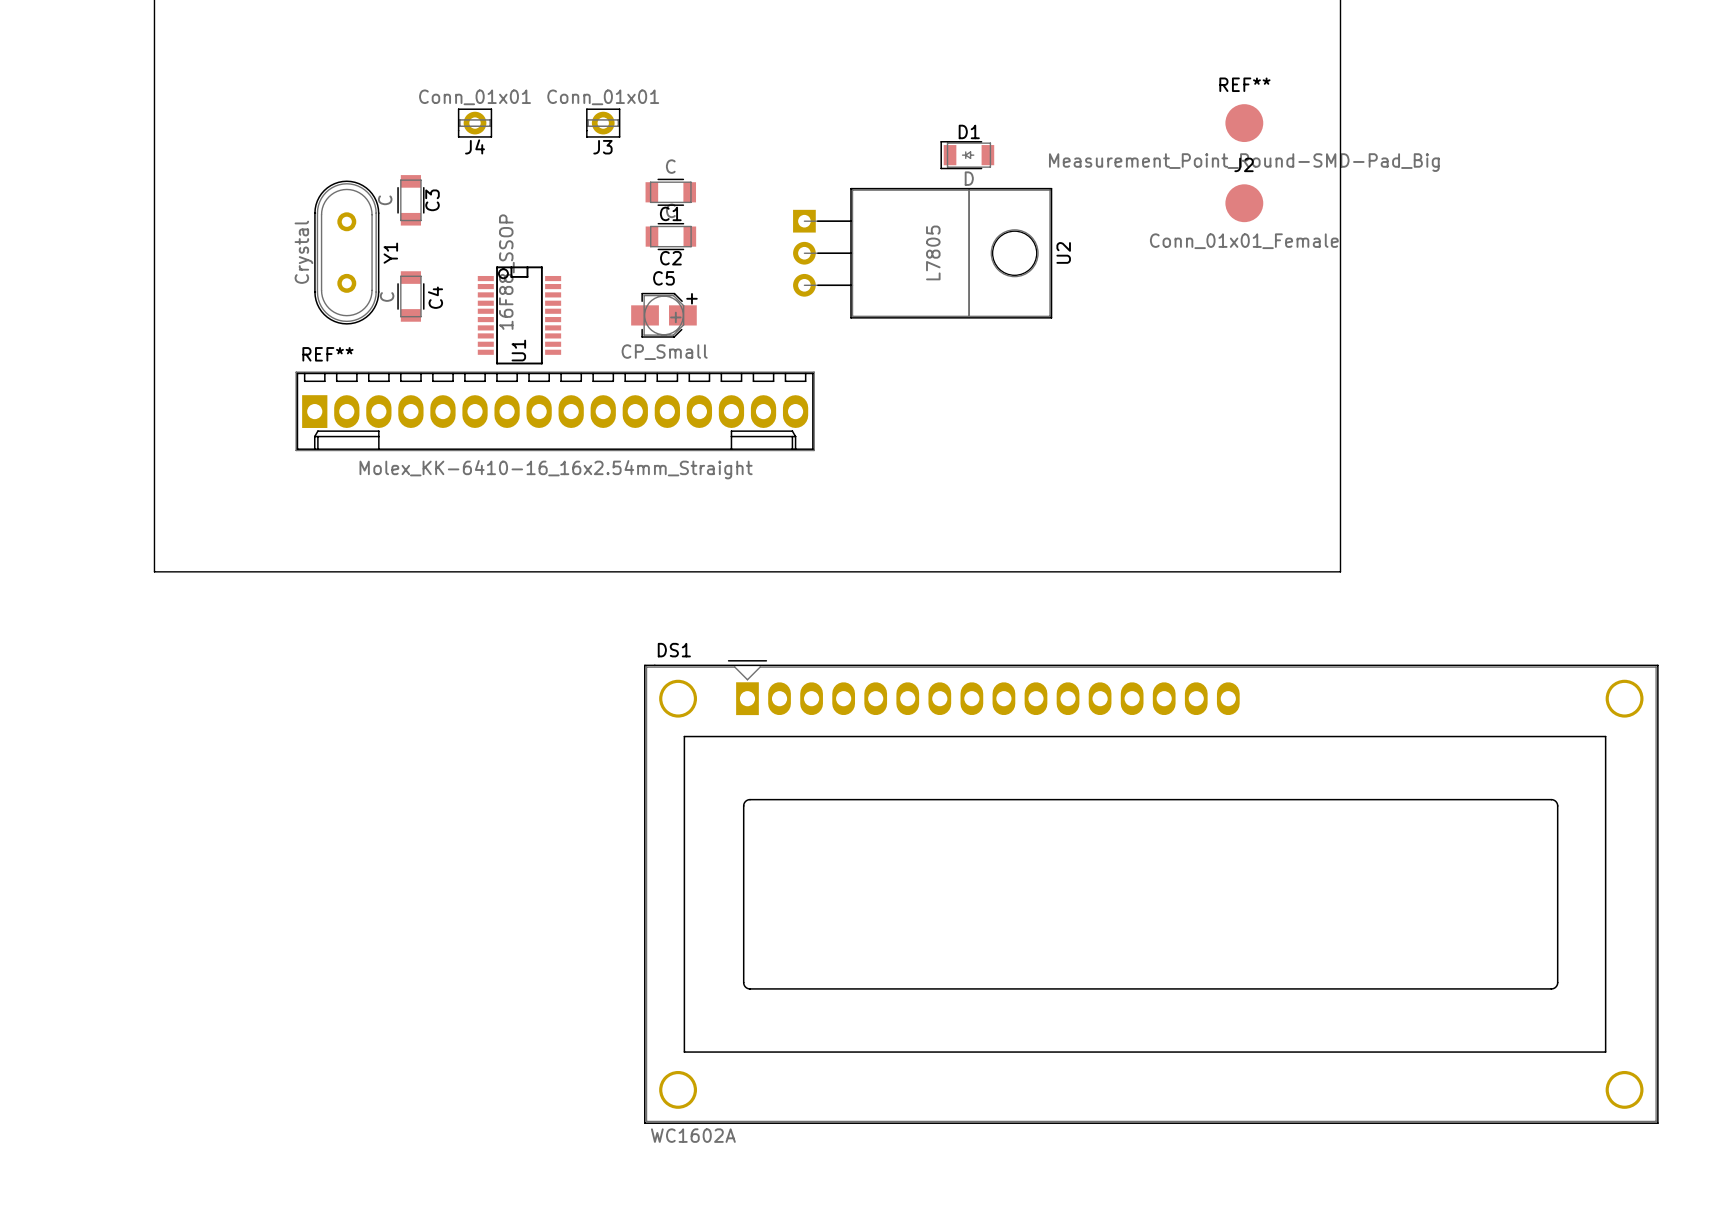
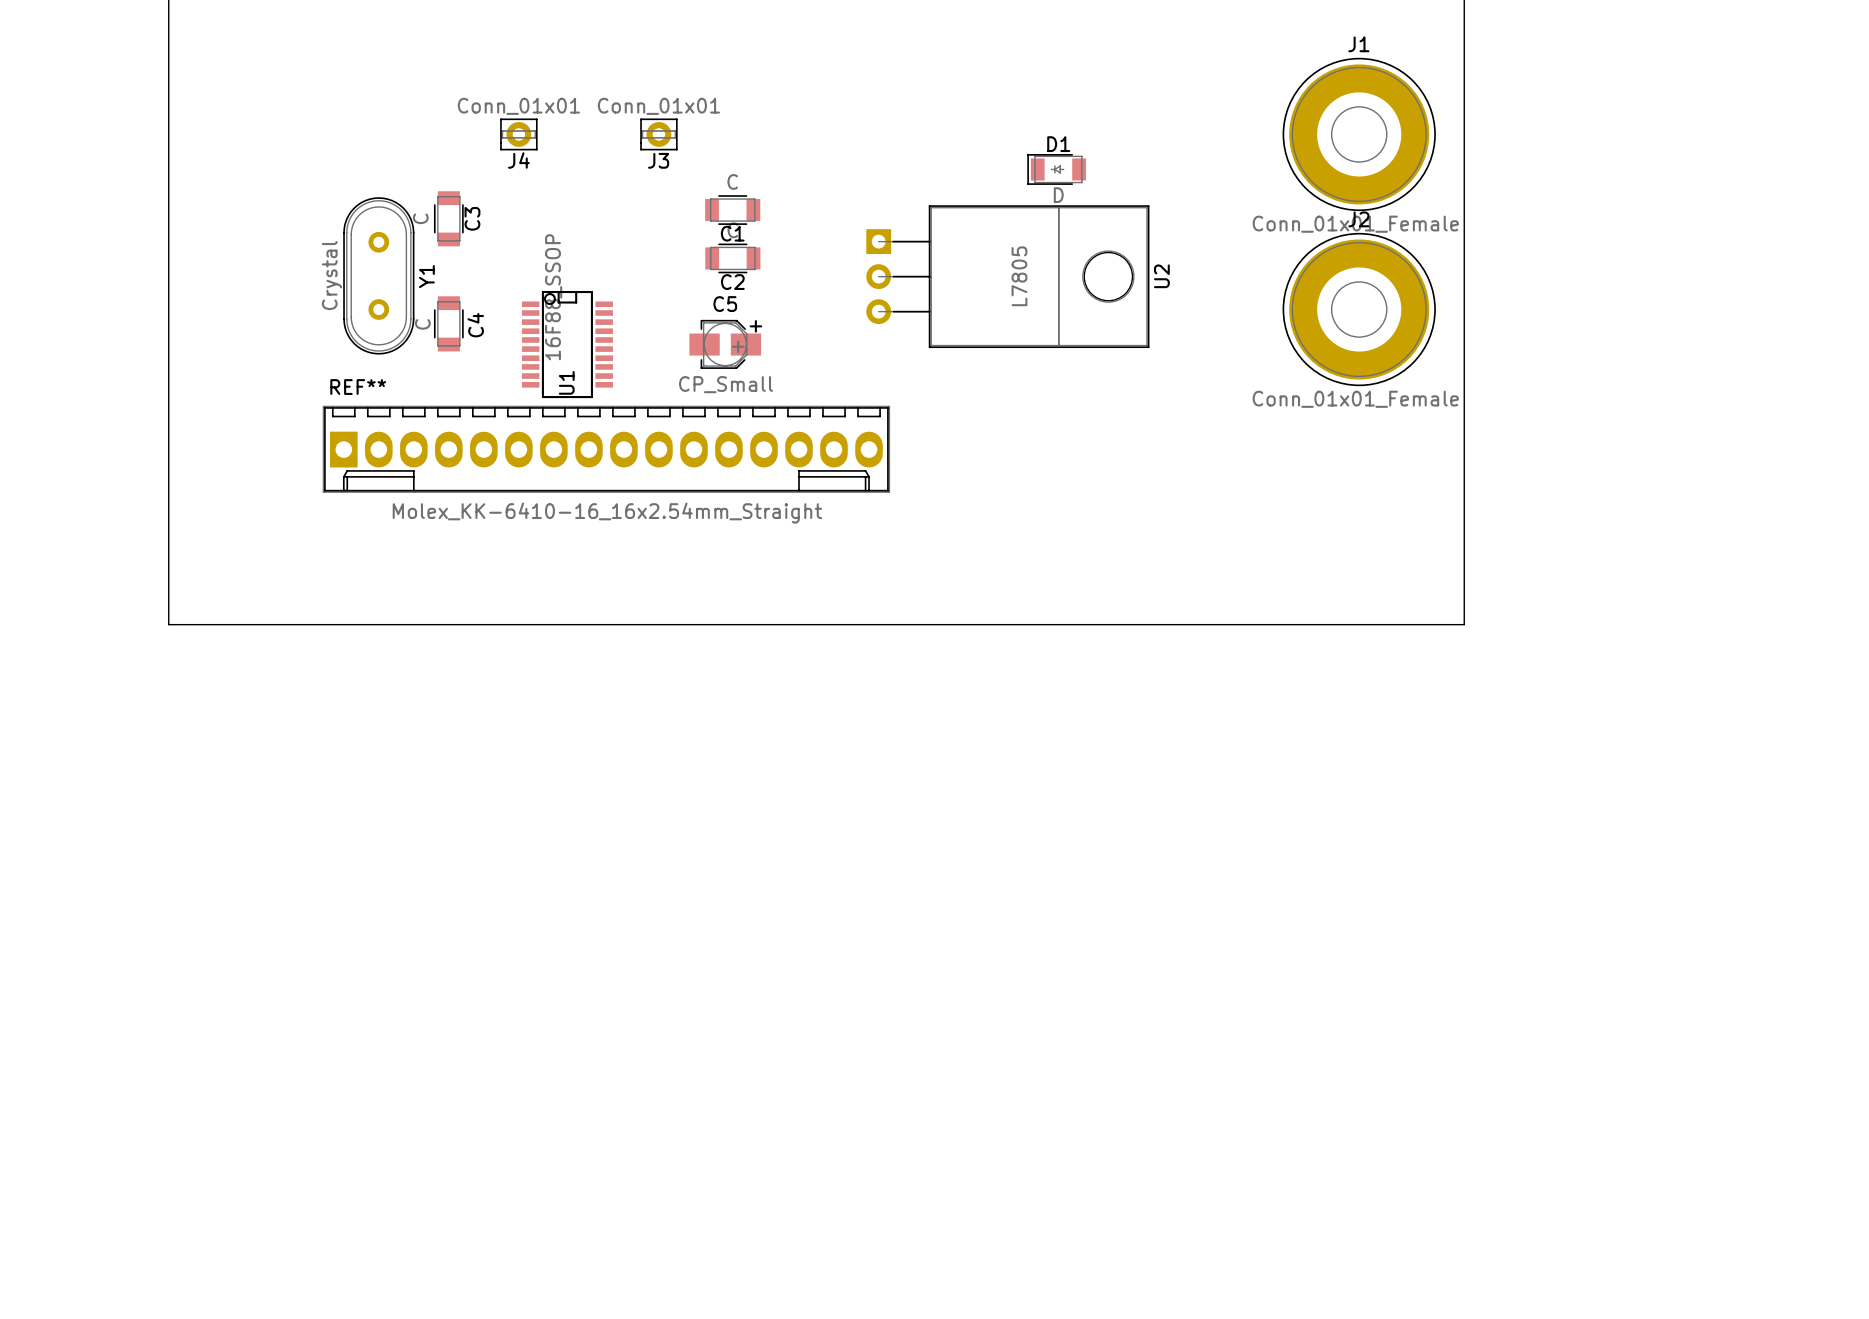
REF**: Measurement_Point_Round-SMD-Pad_Big (1244, 123) -> none
J1: none -> Conn_01x01_Female (1359, 134)
J2 name position: J2 (1244, 164) -> J2 (1358, 219)
J2 footprint: [1225, 184, 1264, 223] -> [1282, 232, 1436, 387]
J2 value position: Conn_01x01_Female (1244, 241) -> Conn_01x01_Female (1355, 399)
DS1: WC1602A (1151, 892) -> none

